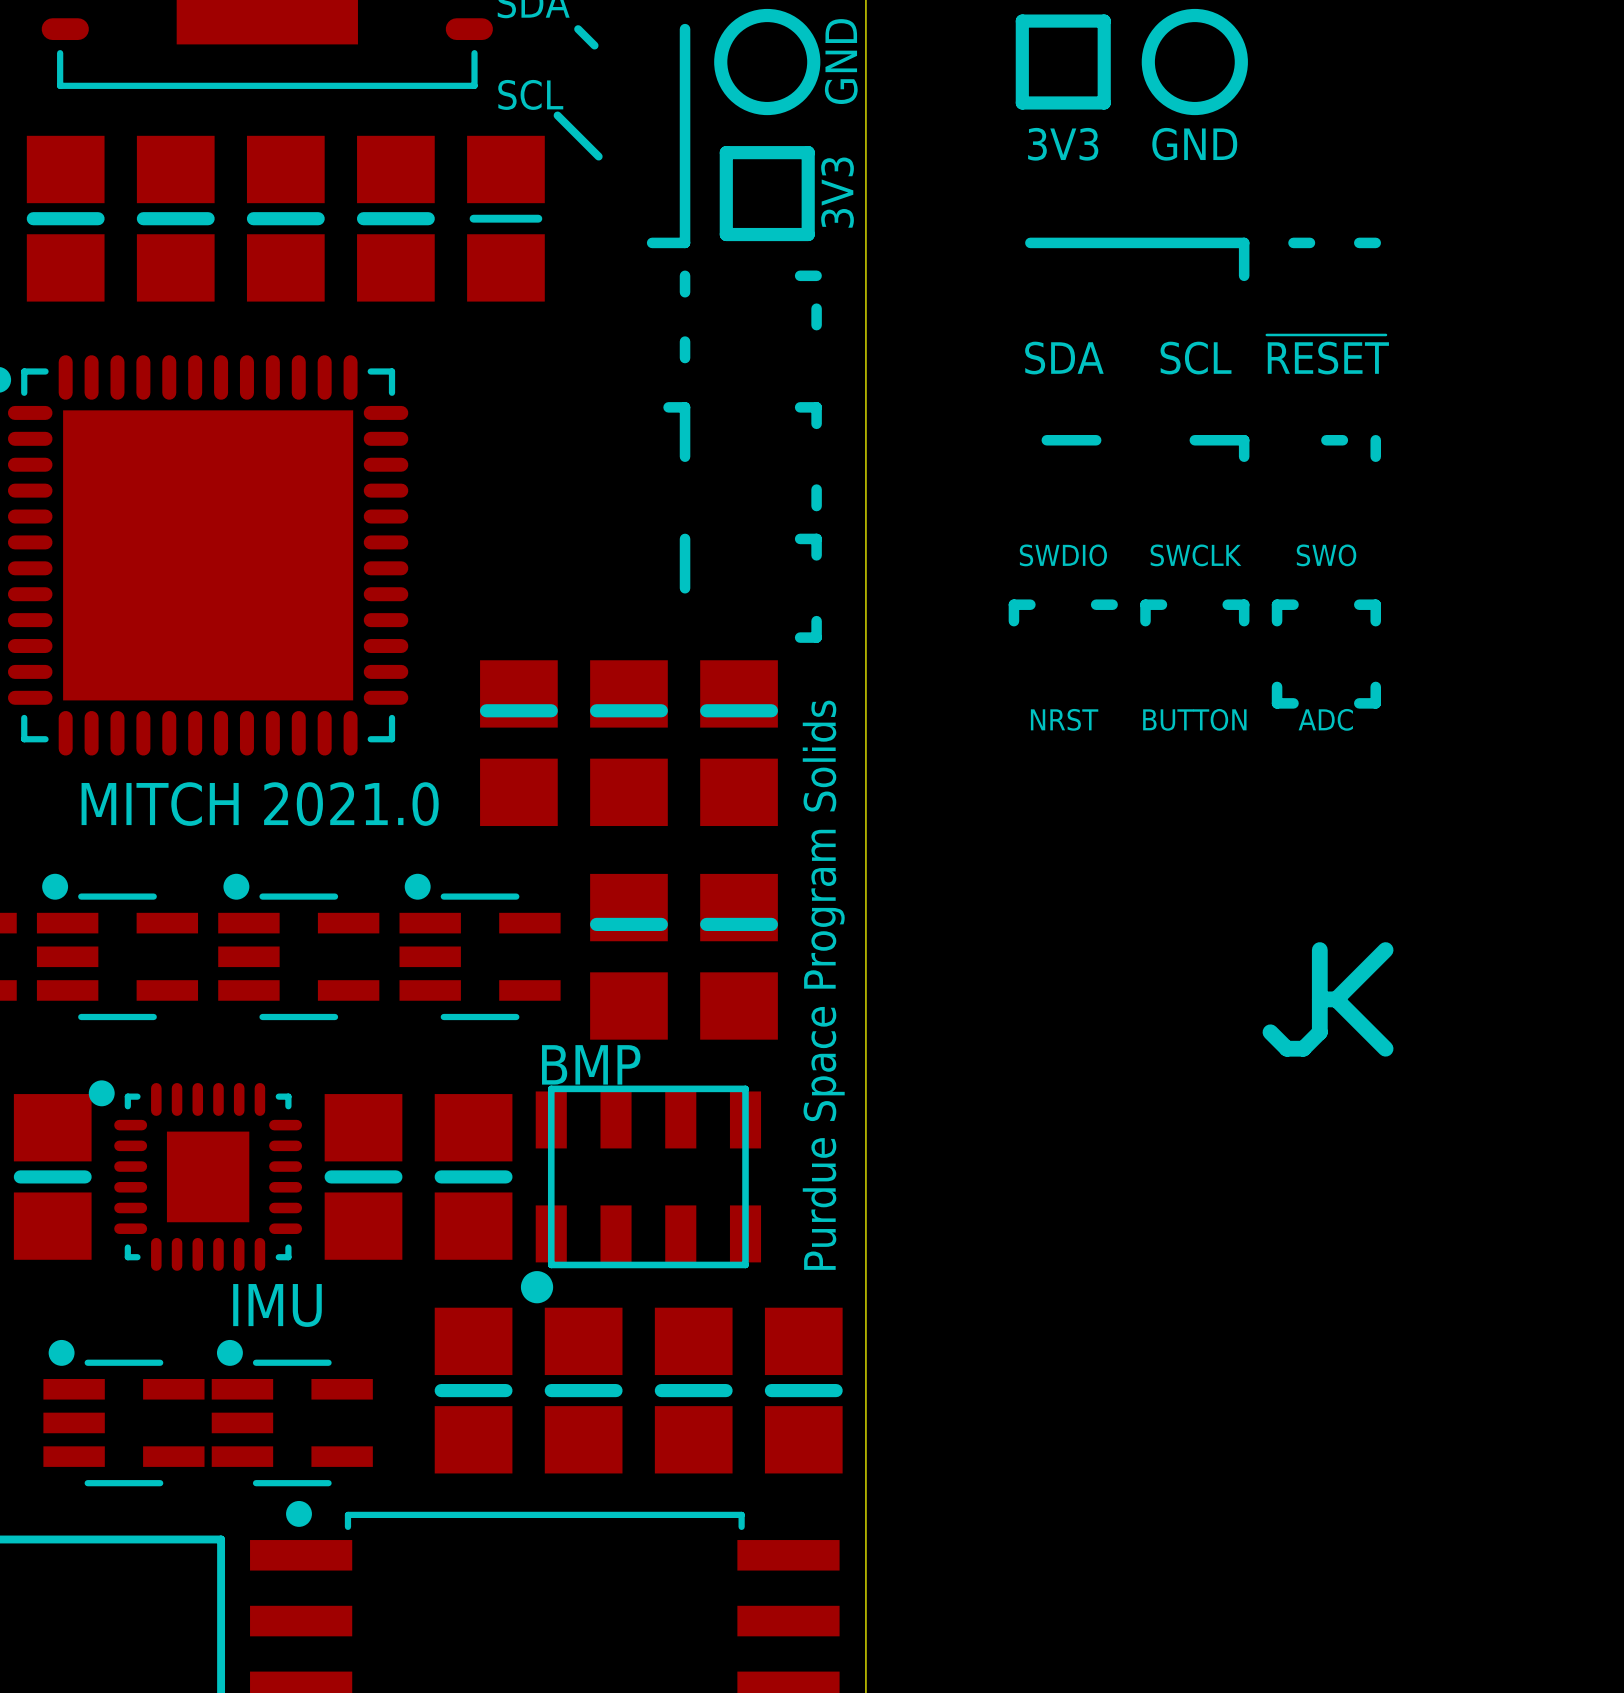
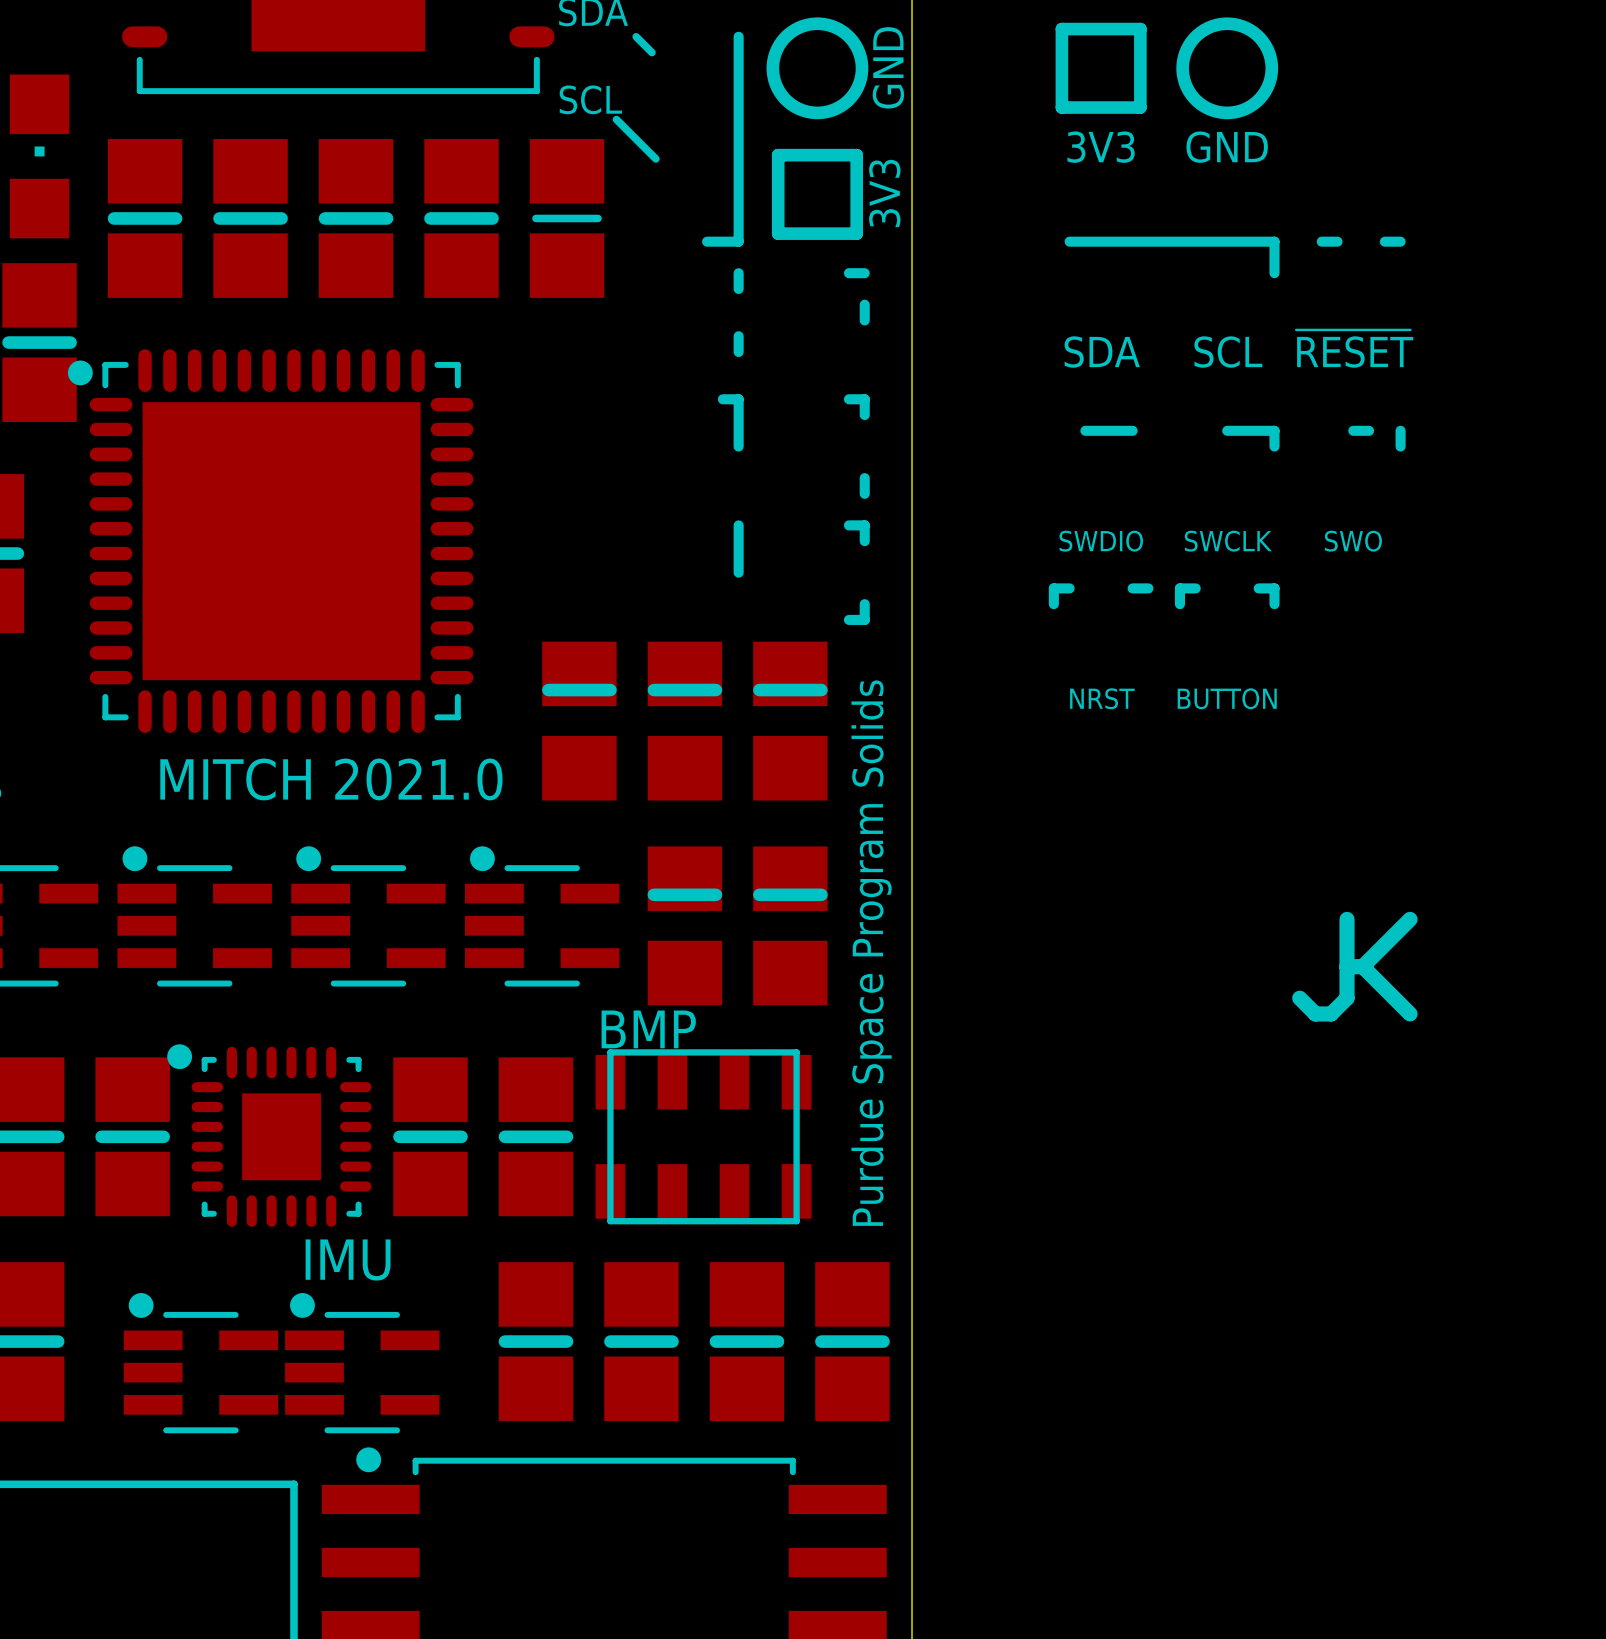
line: (1293, 604) (1277, 604) (1277, 621) -> none
line: (1359, 604) (1375, 604) (1375, 621) -> none
line: (1277, 686) (1277, 703) (1293, 703) -> none
line: (1375, 686) (1375, 703) (1359, 703) -> none
text: ADC (1325, 719) -> none
drawing: [520, 1271, 554, 1304] -> none

